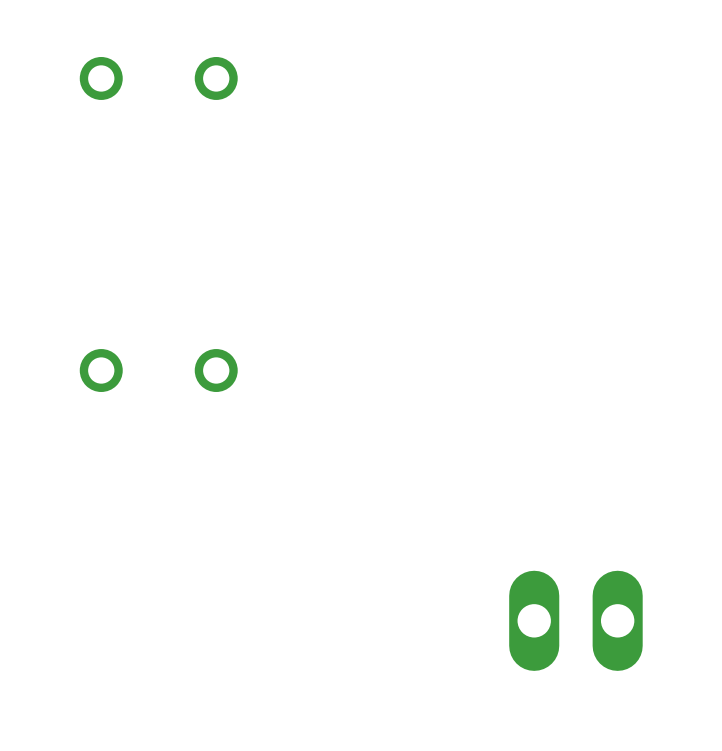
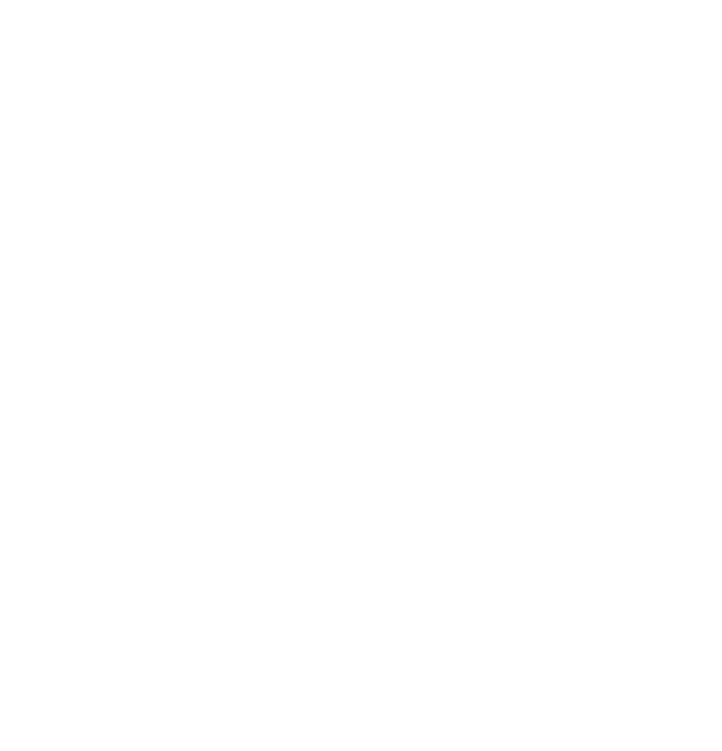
part: (158, 78) -> none
part: (158, 370) -> none
part: (575, 620) -> none

